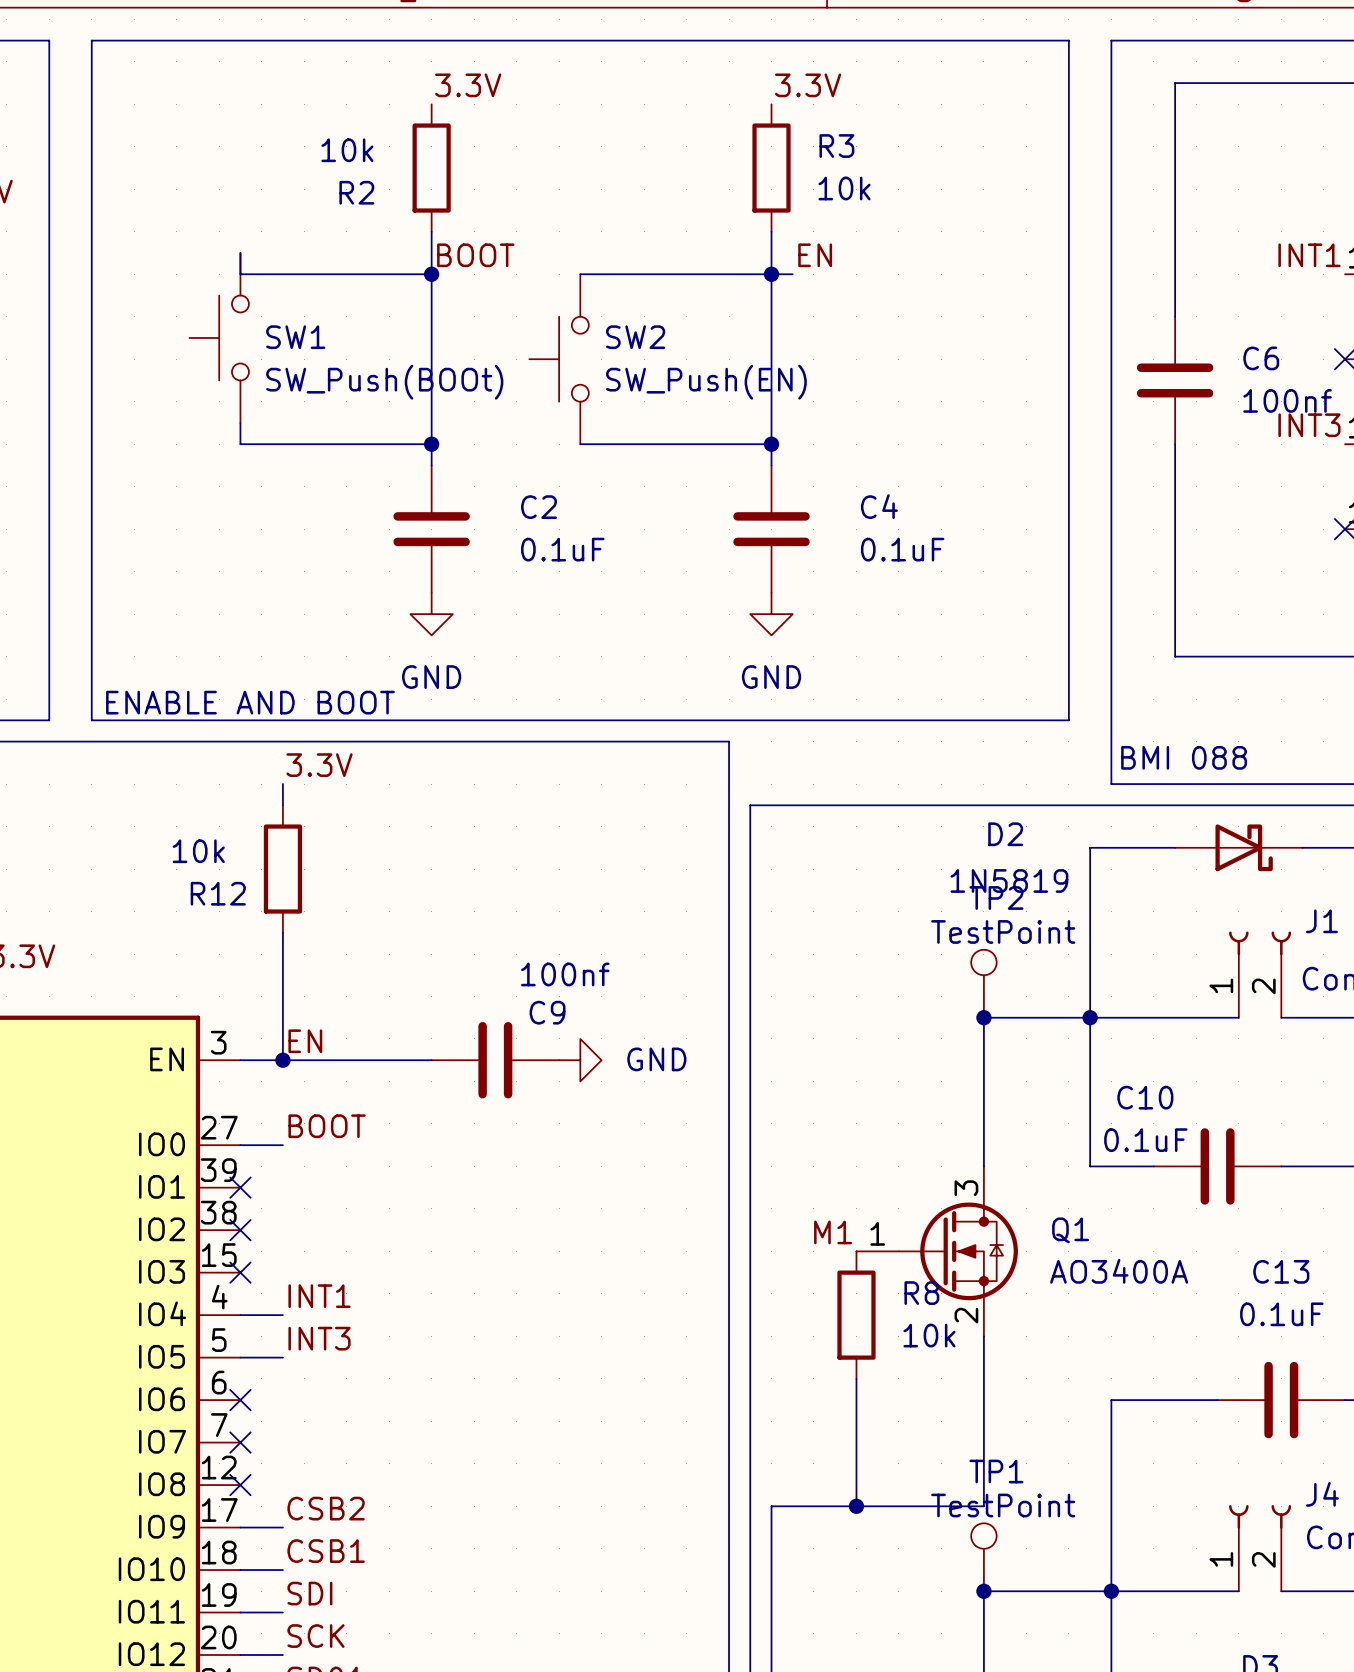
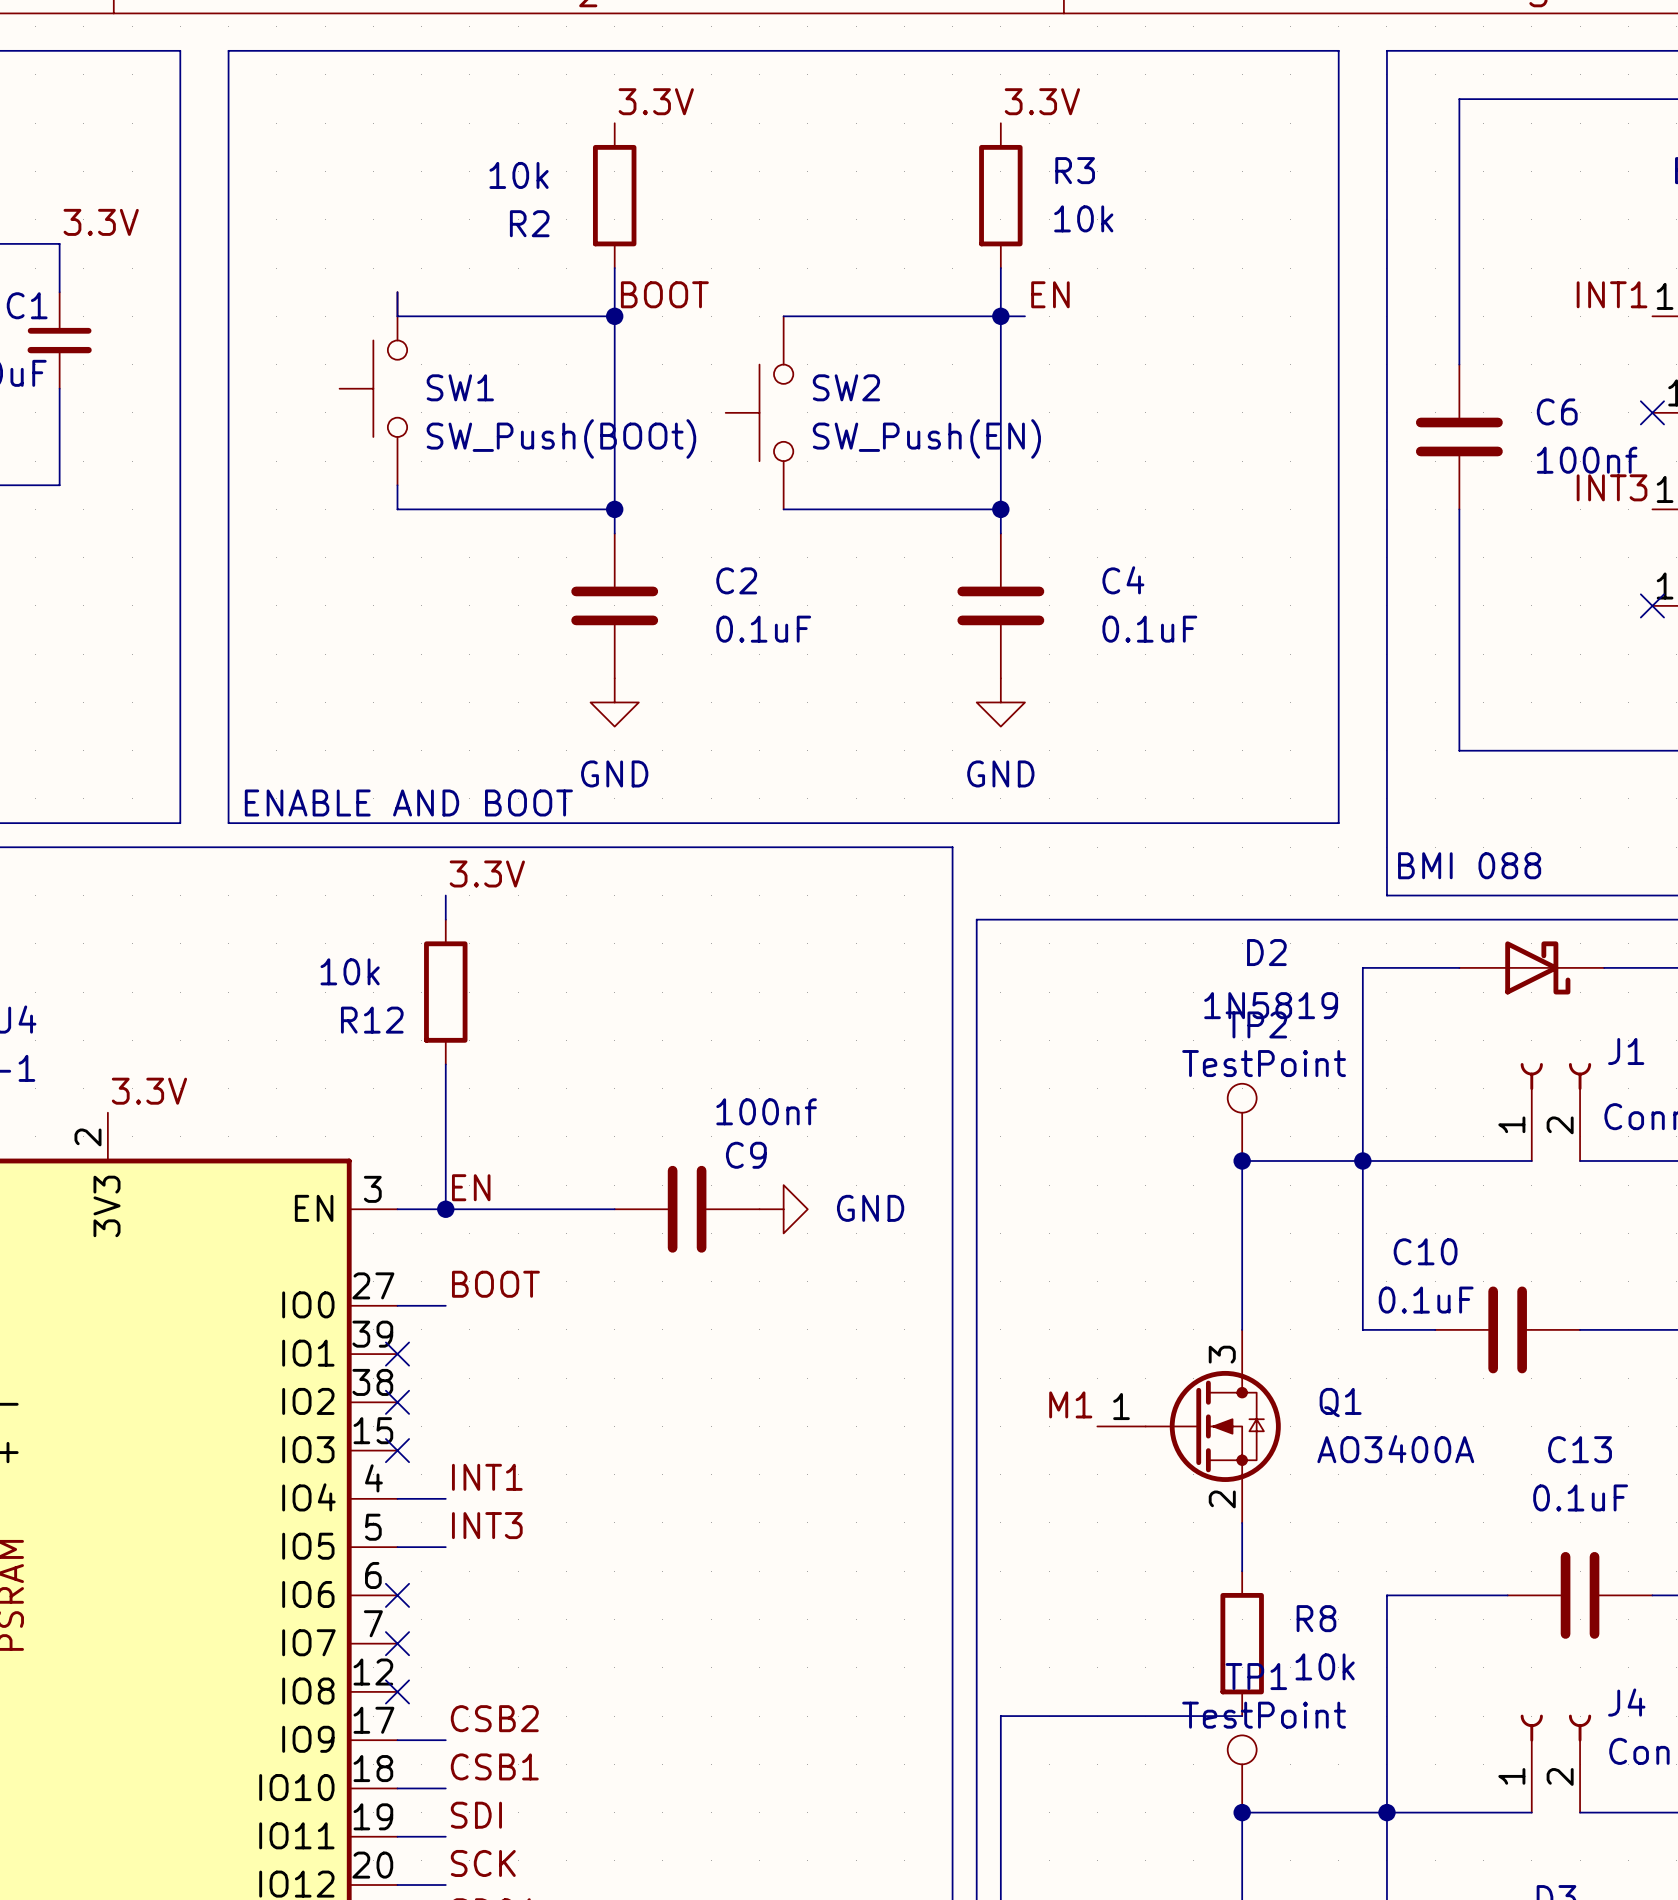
R8 position: (856, 1315) -> (1242, 1643)
wire: (856, 1378) (856, 1506) -> none
wire: (983, 1378) (983, 1506) -> none
junction: (856, 1506) -> none

